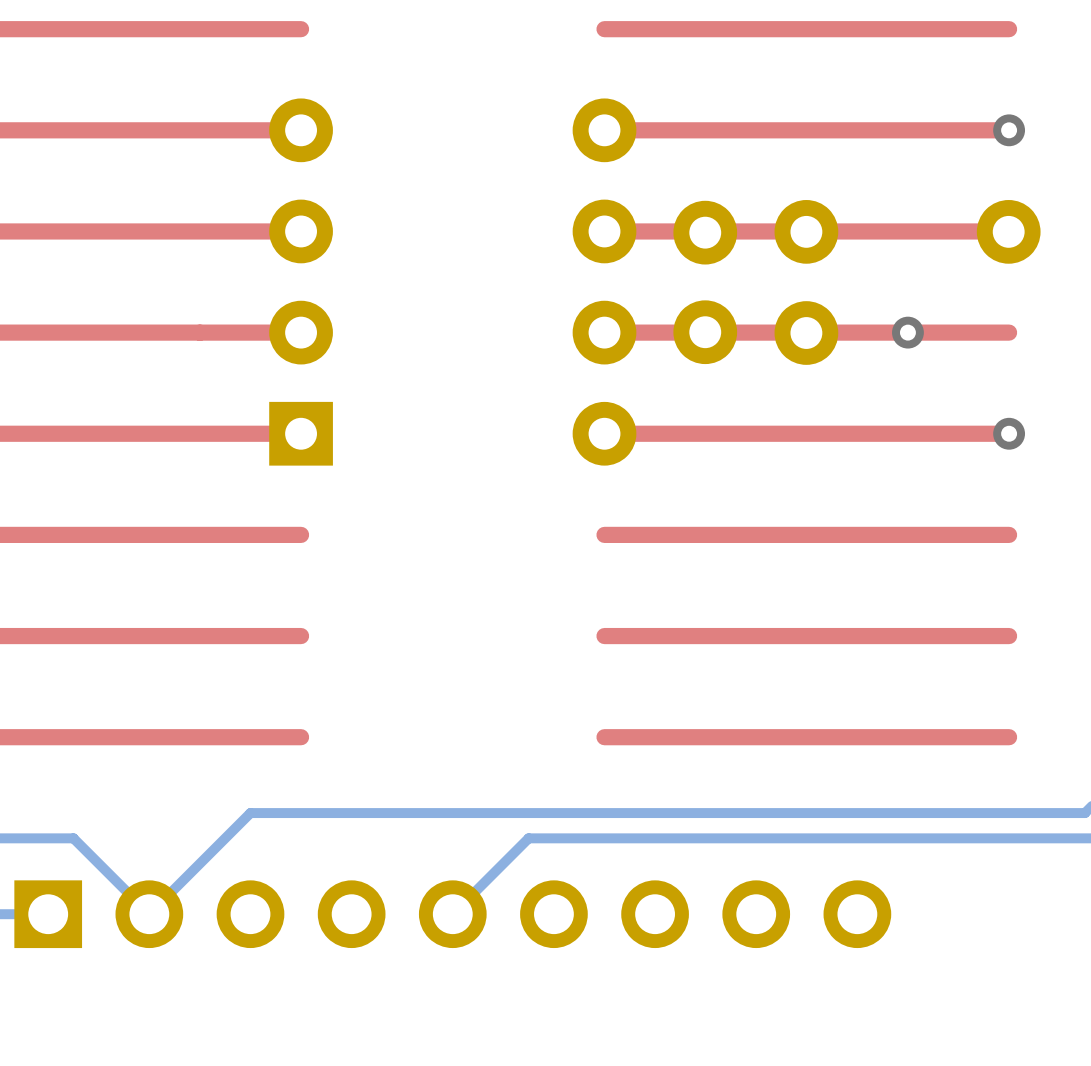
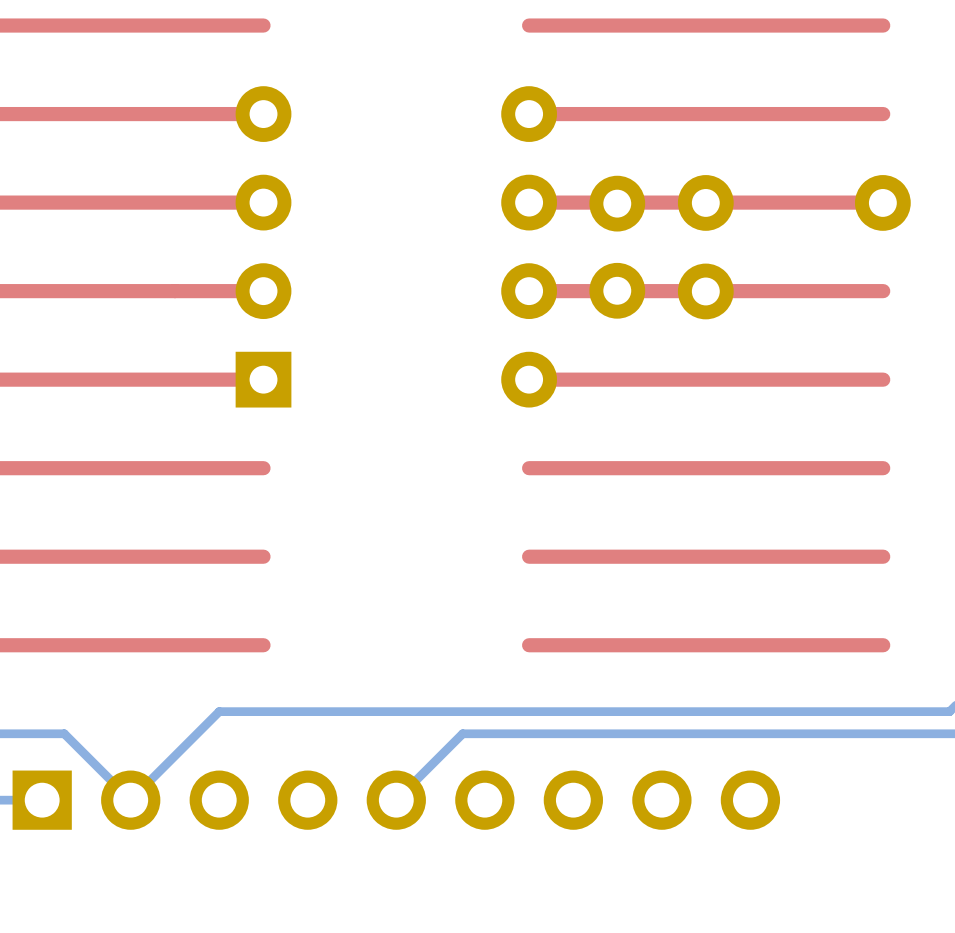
via: (1009, 130) -> none
via: (907, 332) -> none
via: (1009, 433) -> none

